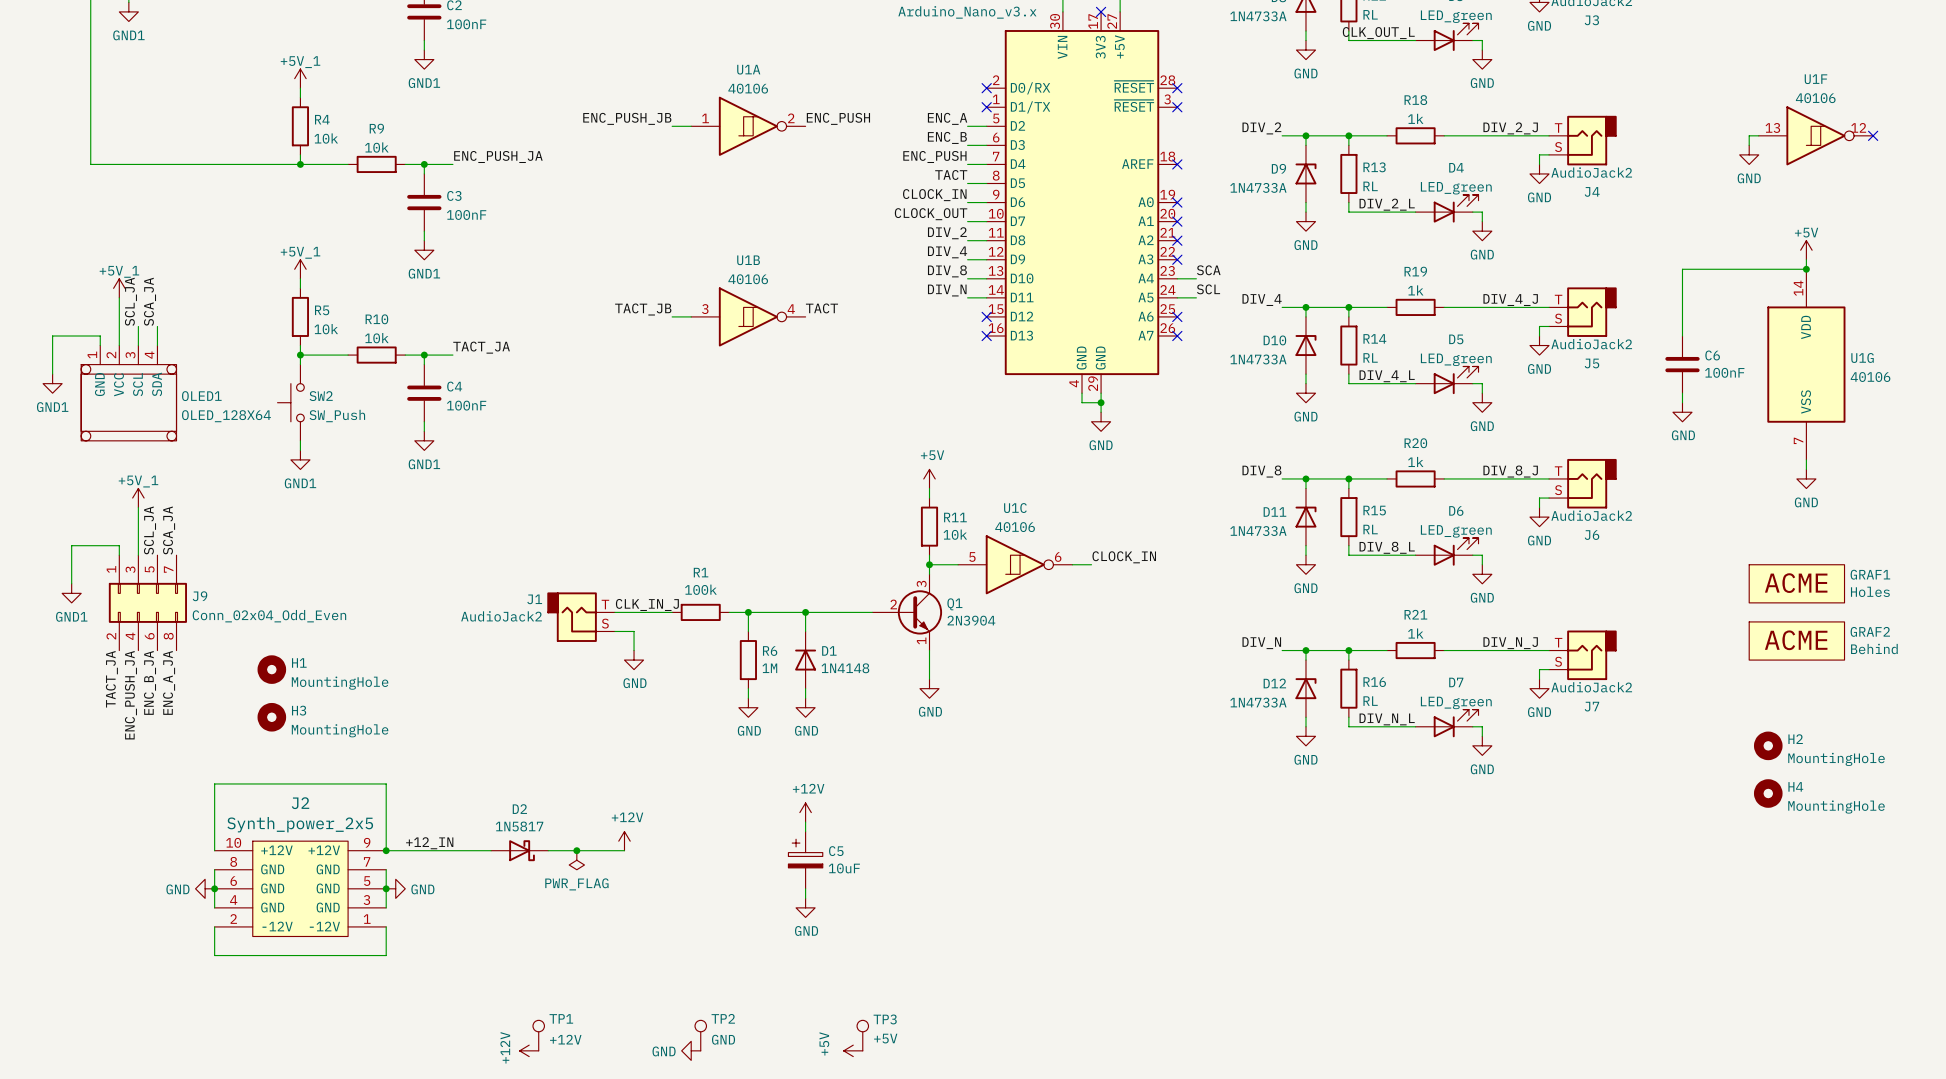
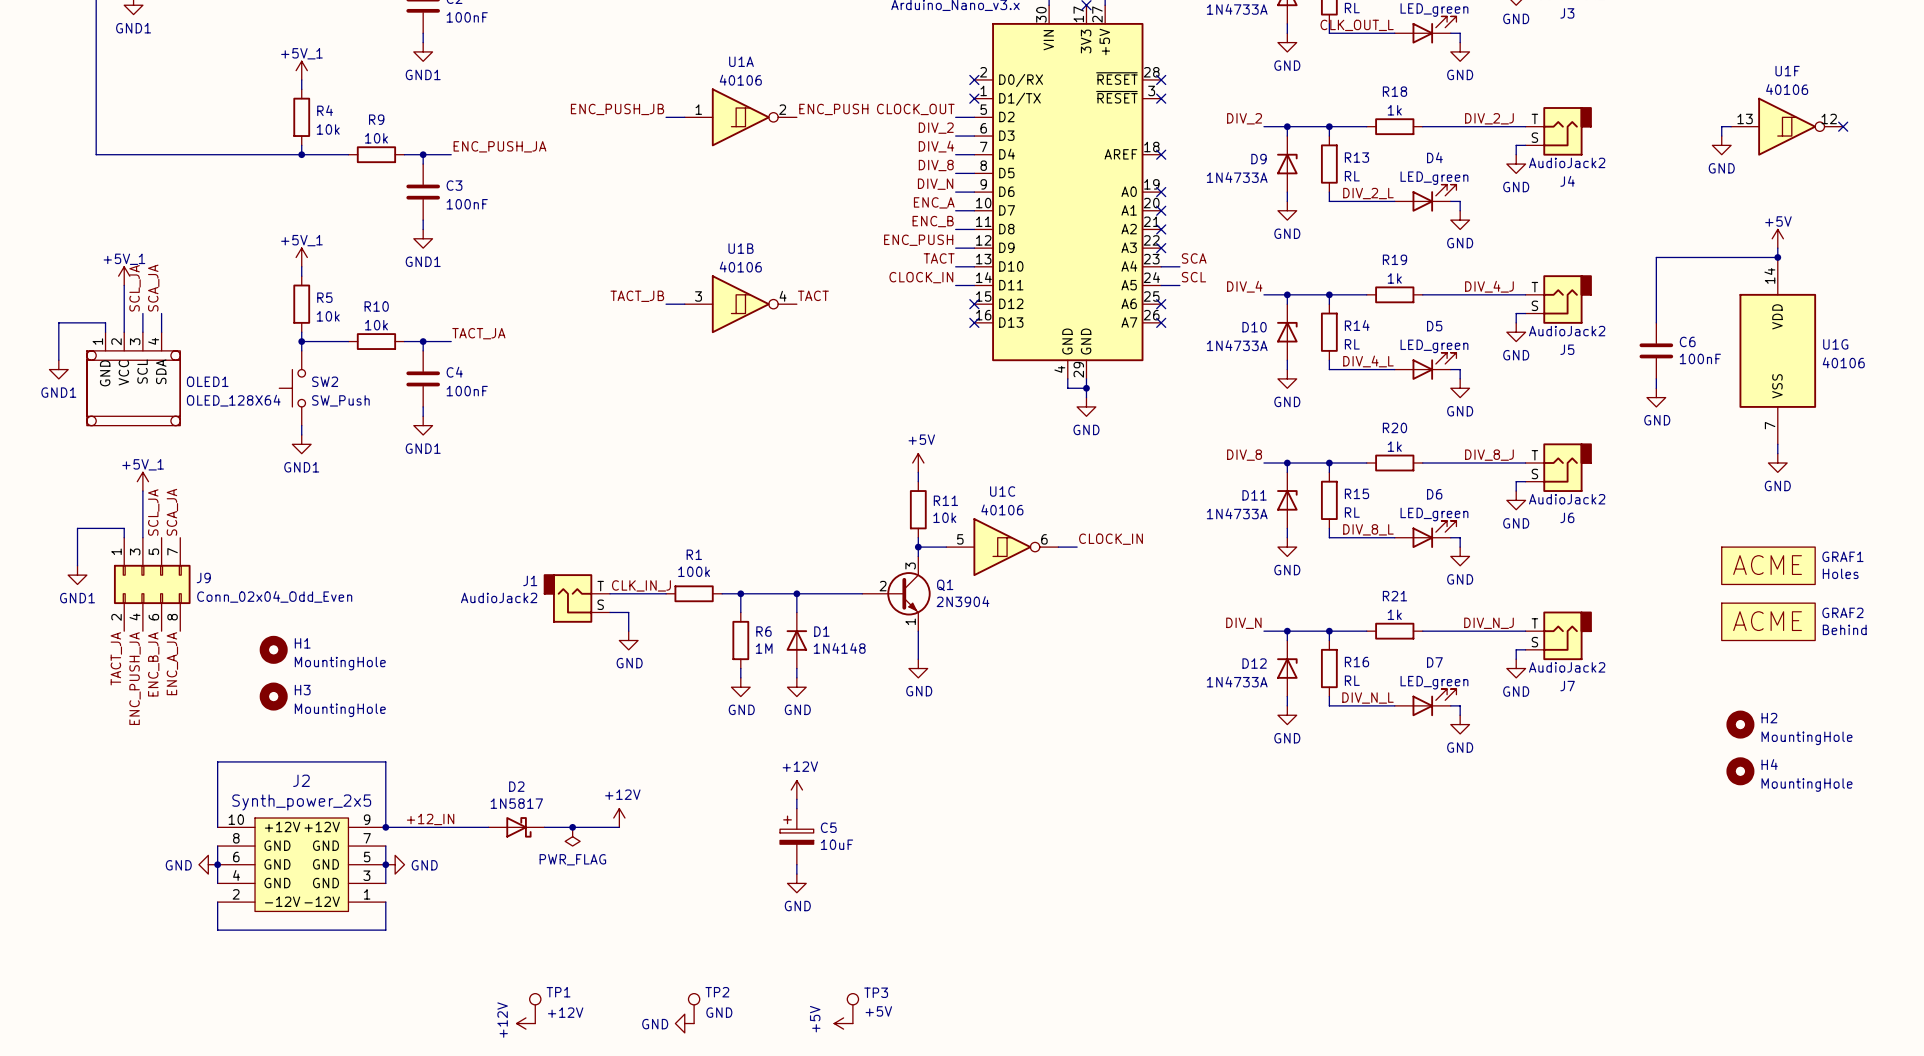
label: ENC_A (947, 118) -> CLOCK_OUT (915, 109)
label: ENC_B (947, 137) -> DIV_2 (936, 128)
label: ENC_PUSH (934, 157) -> DIV_4 (936, 146)
label: TACT (951, 174) -> DIV_8 (936, 165)
label: CLOCK_IN (934, 195) -> DIV_N (935, 184)
label: CLOCK_OUT (931, 214) -> ENC_A (934, 202)
label: DIV_2 (947, 233) -> ENC_B (933, 221)
label: DIV_4 (947, 252) -> ENC_PUSH (918, 240)
label: DIV_8 (947, 271) -> TACT (939, 258)
label: DIV_N (947, 290) -> CLOCK_IN (921, 277)

